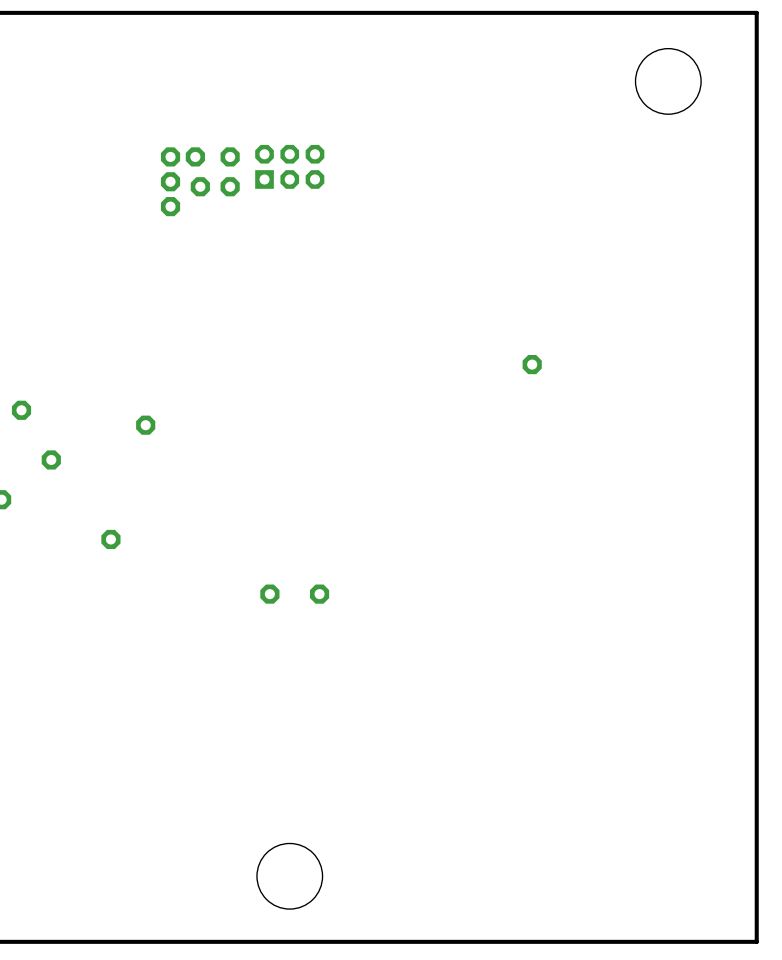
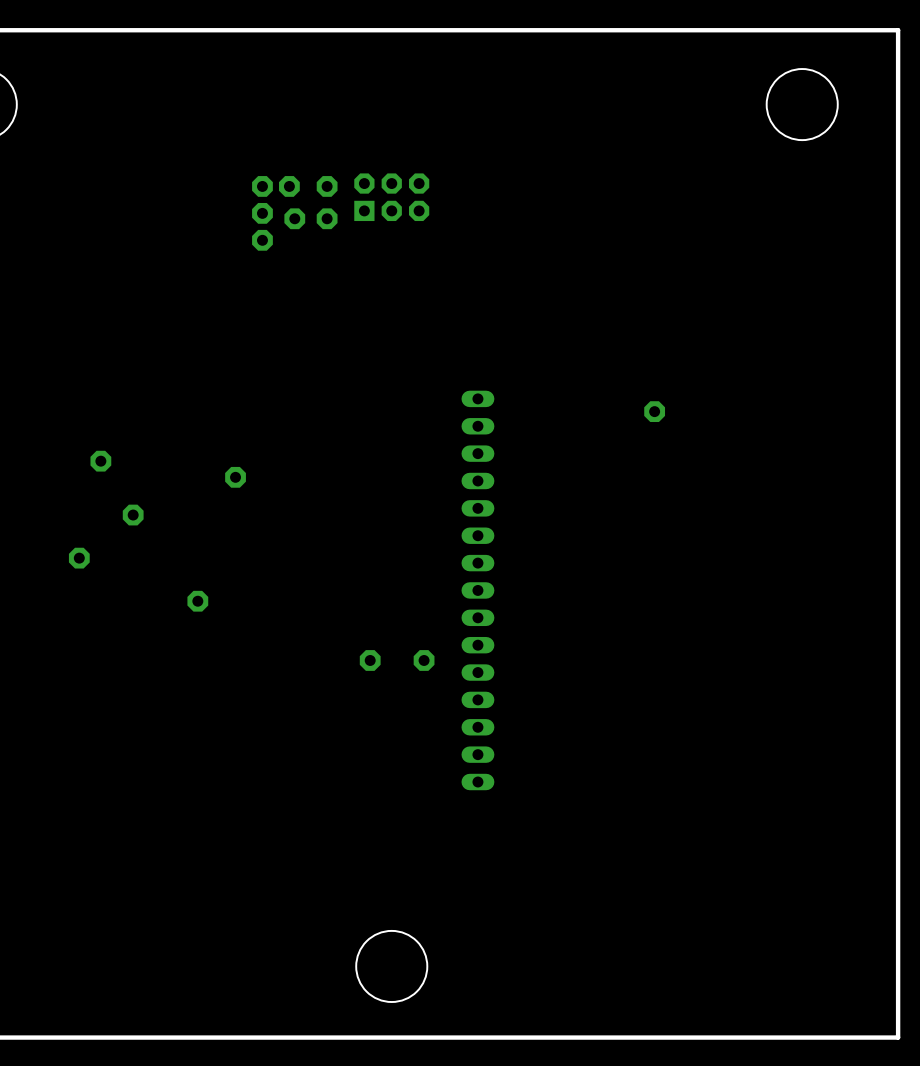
part: none -> (477, 590)

